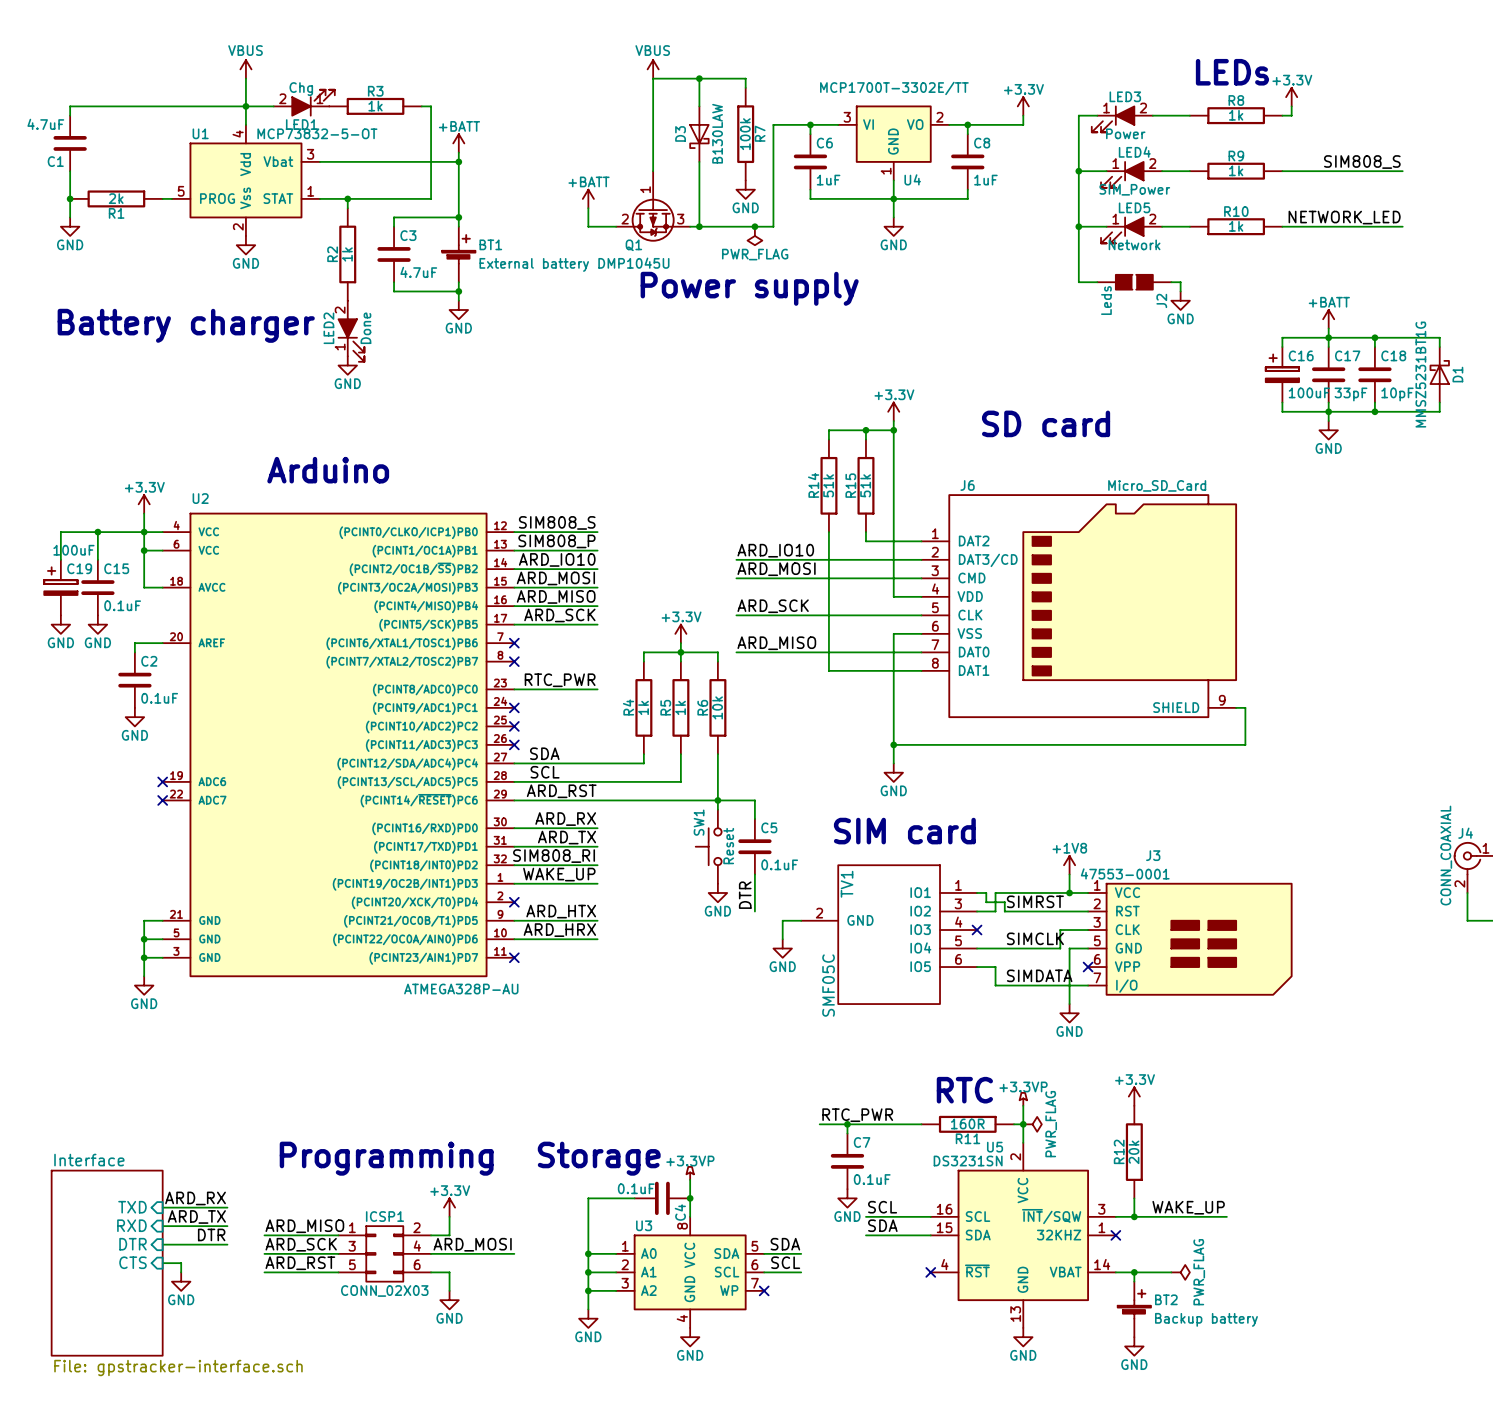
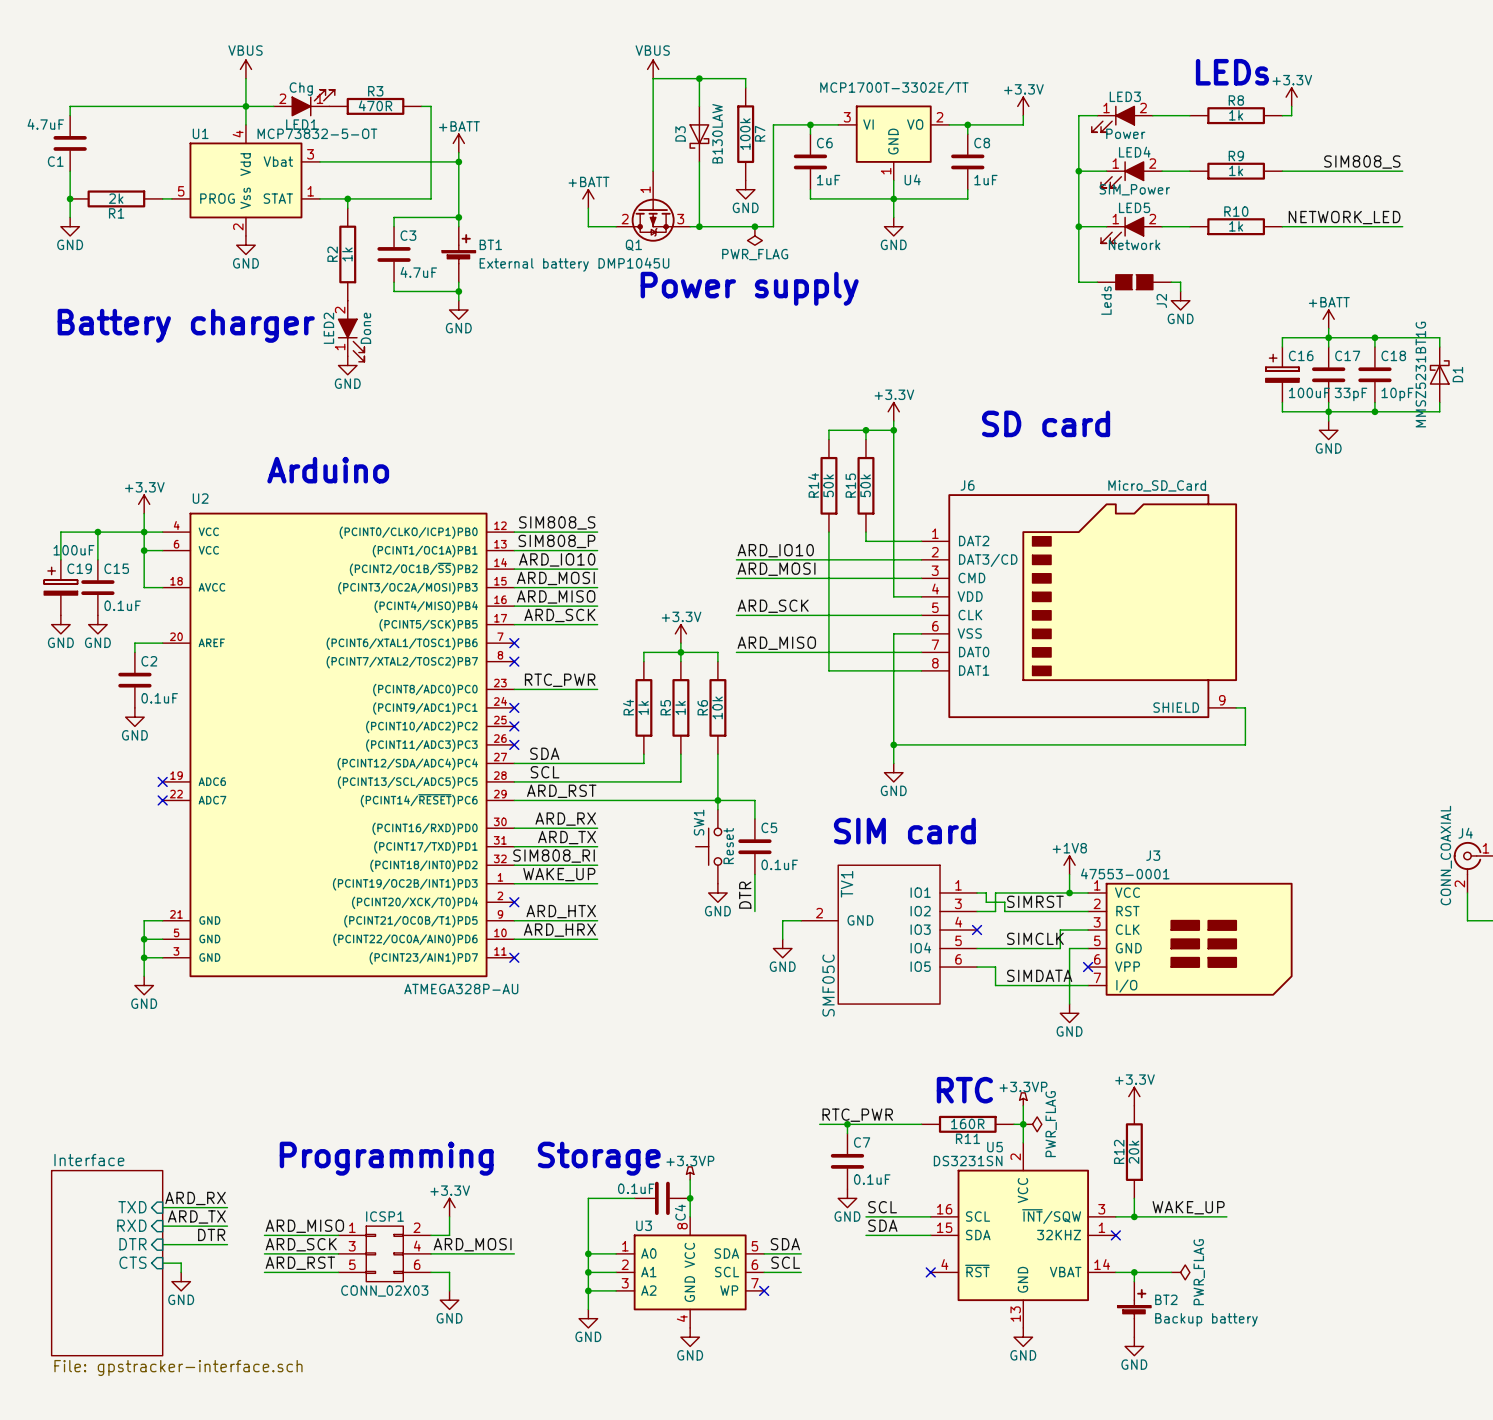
R3 value: 1k (375, 106) -> 470R (375, 105)
R14 value: 51k (828, 485) -> 50k (828, 485)
R15 value: 51k (865, 485) -> 50k (865, 485)

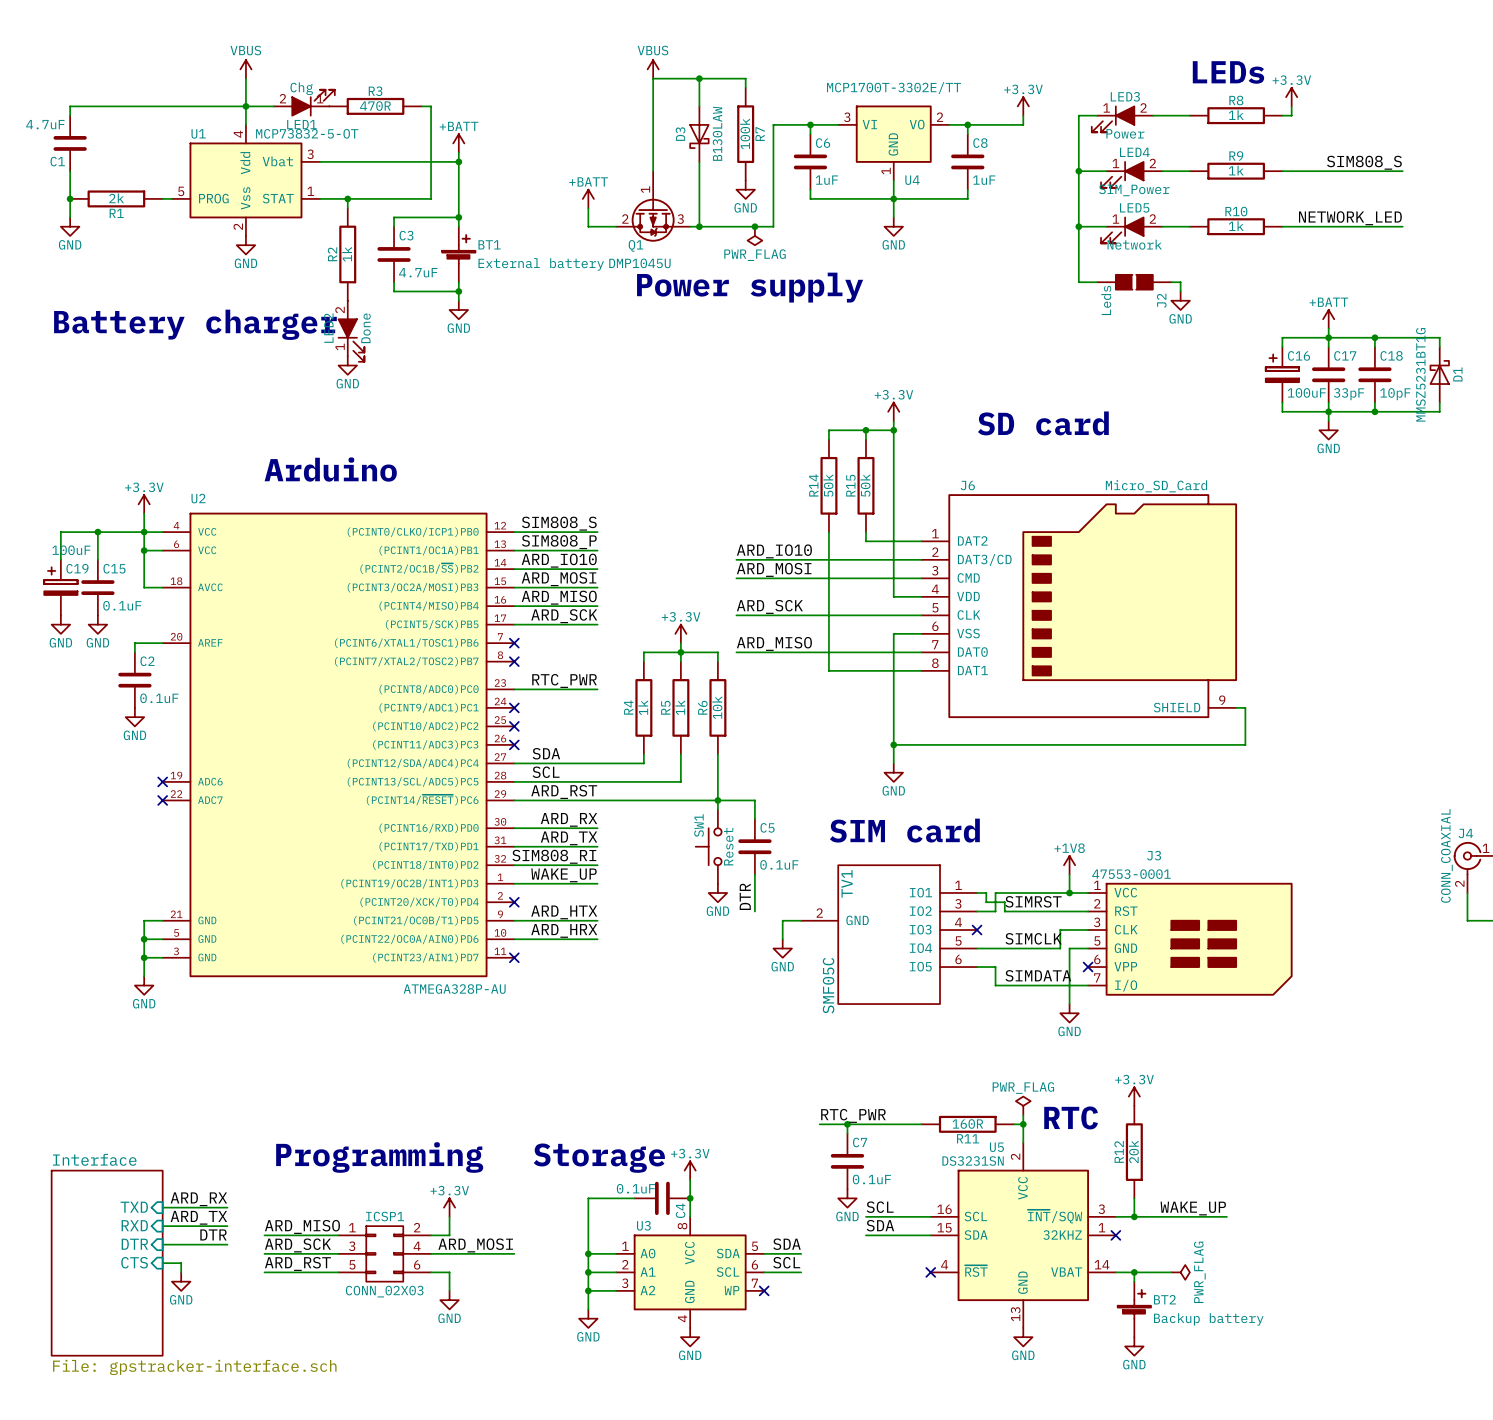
text position: RTC (964, 1090) -> RTC (1071, 1117)
power symbol: +3.3VP (1023, 1099) -> PWR_FLAG (1023, 1105)
power symbol: PWR_FLAG (1032, 1124) -> none
power symbol: +3.3VP (690, 1173) -> +3.3V (690, 1170)

